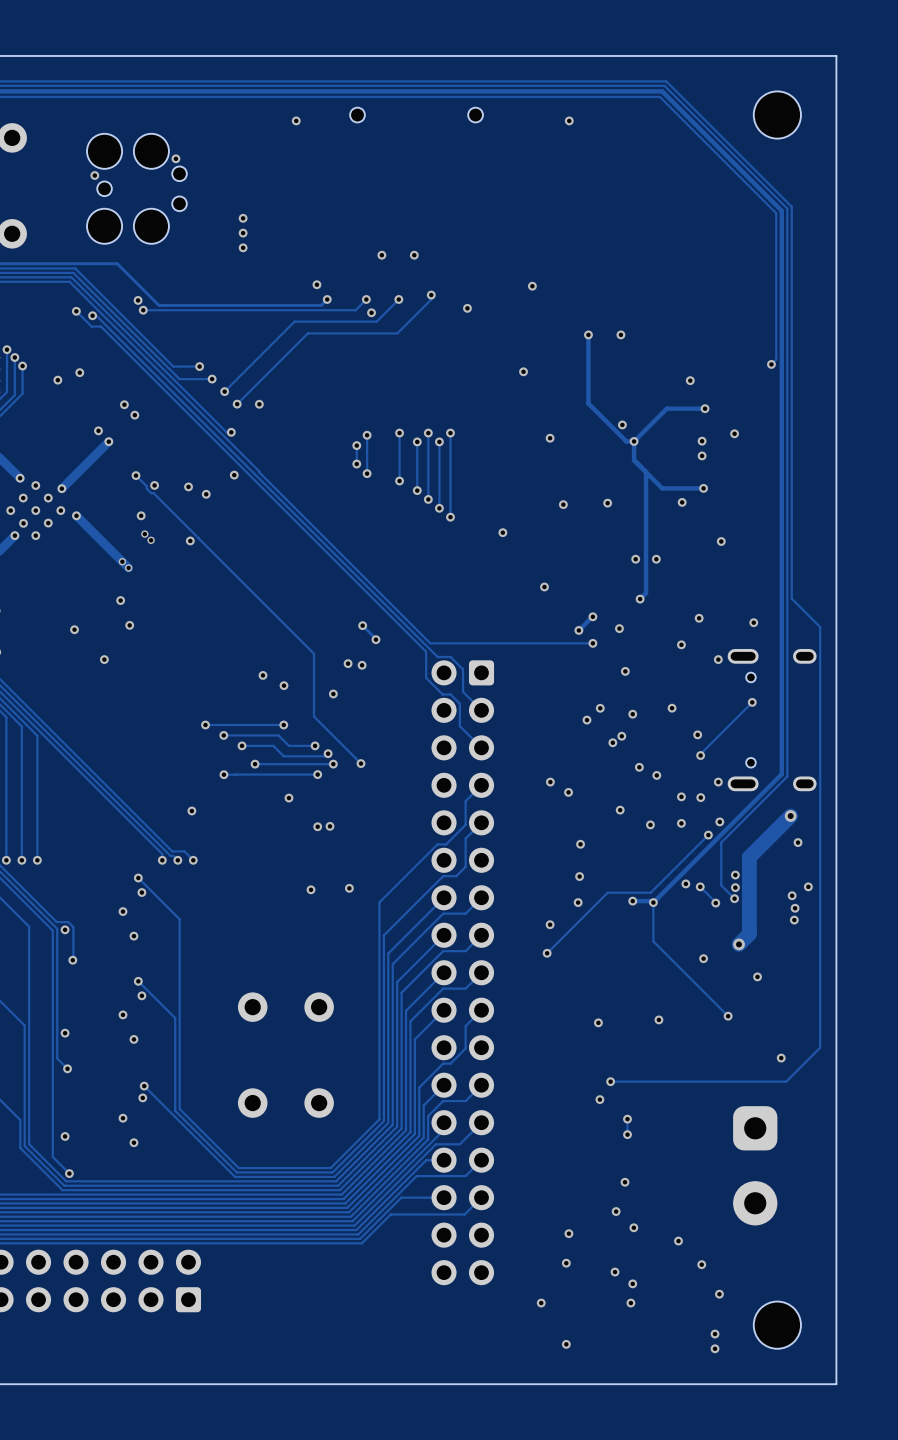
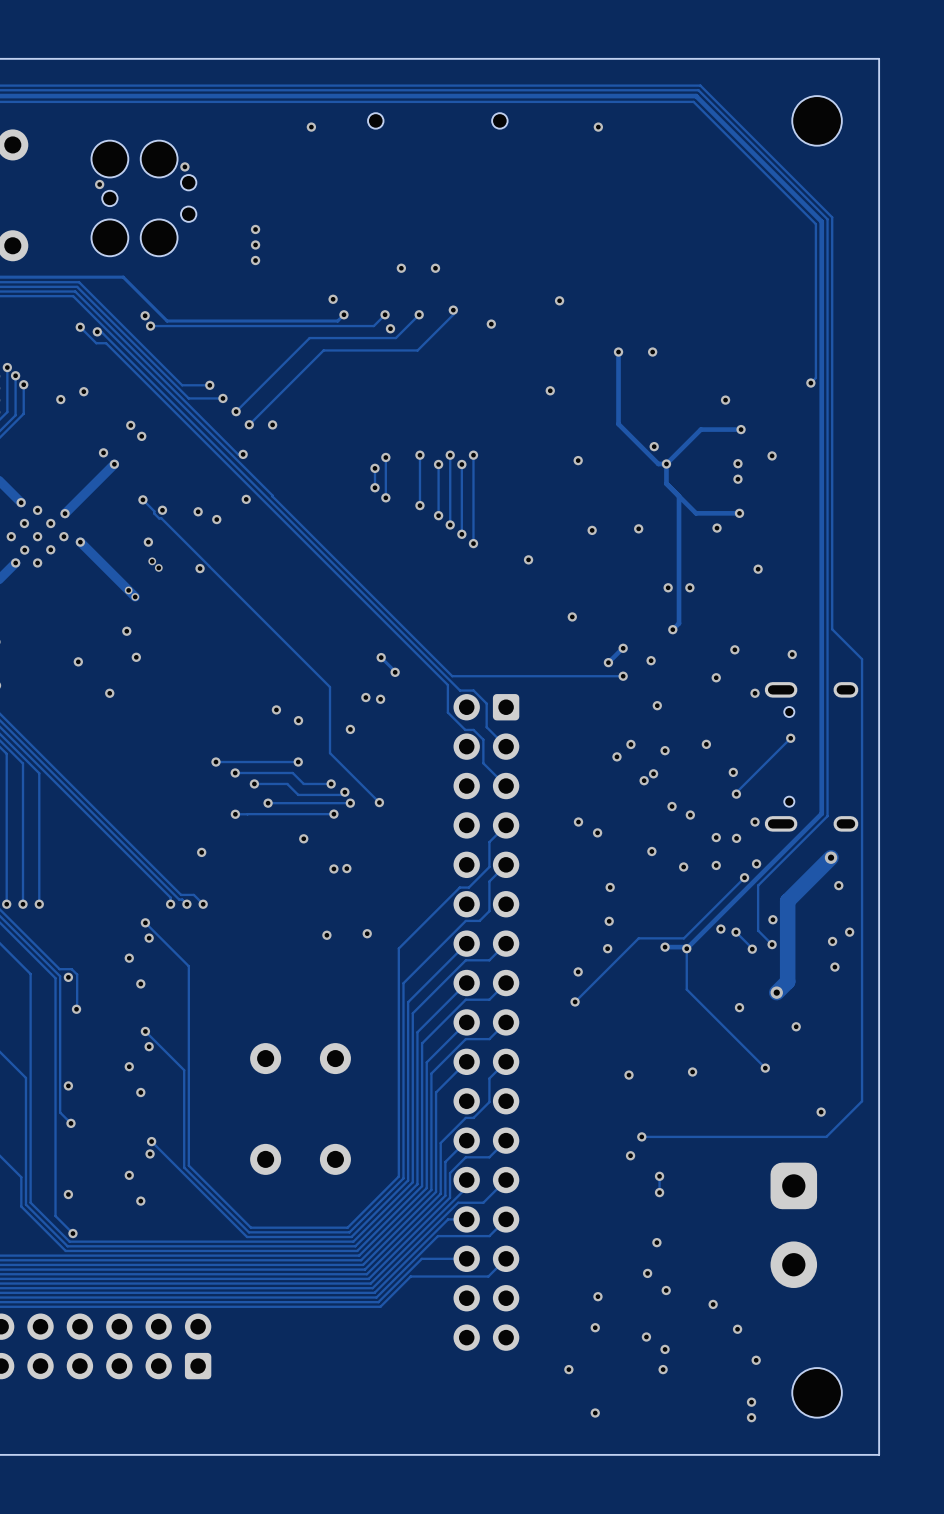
via: (735, 887) -> none
via: (795, 908) -> none

